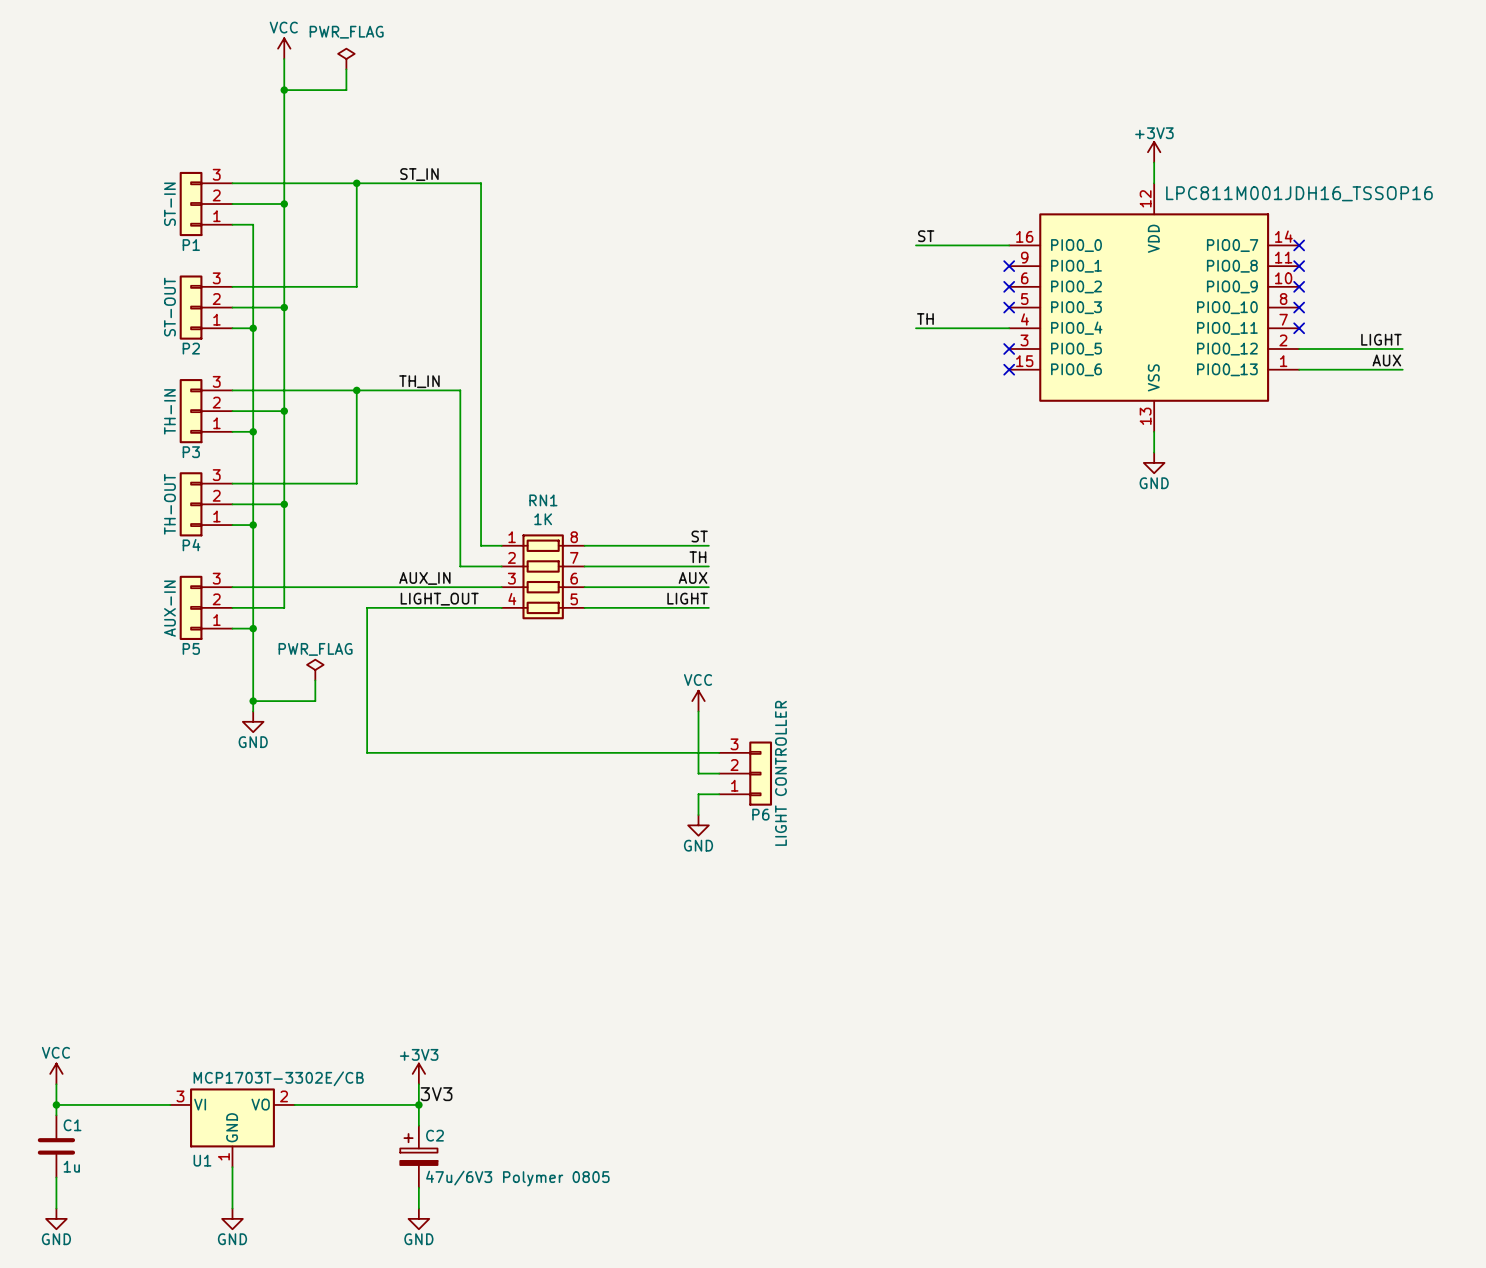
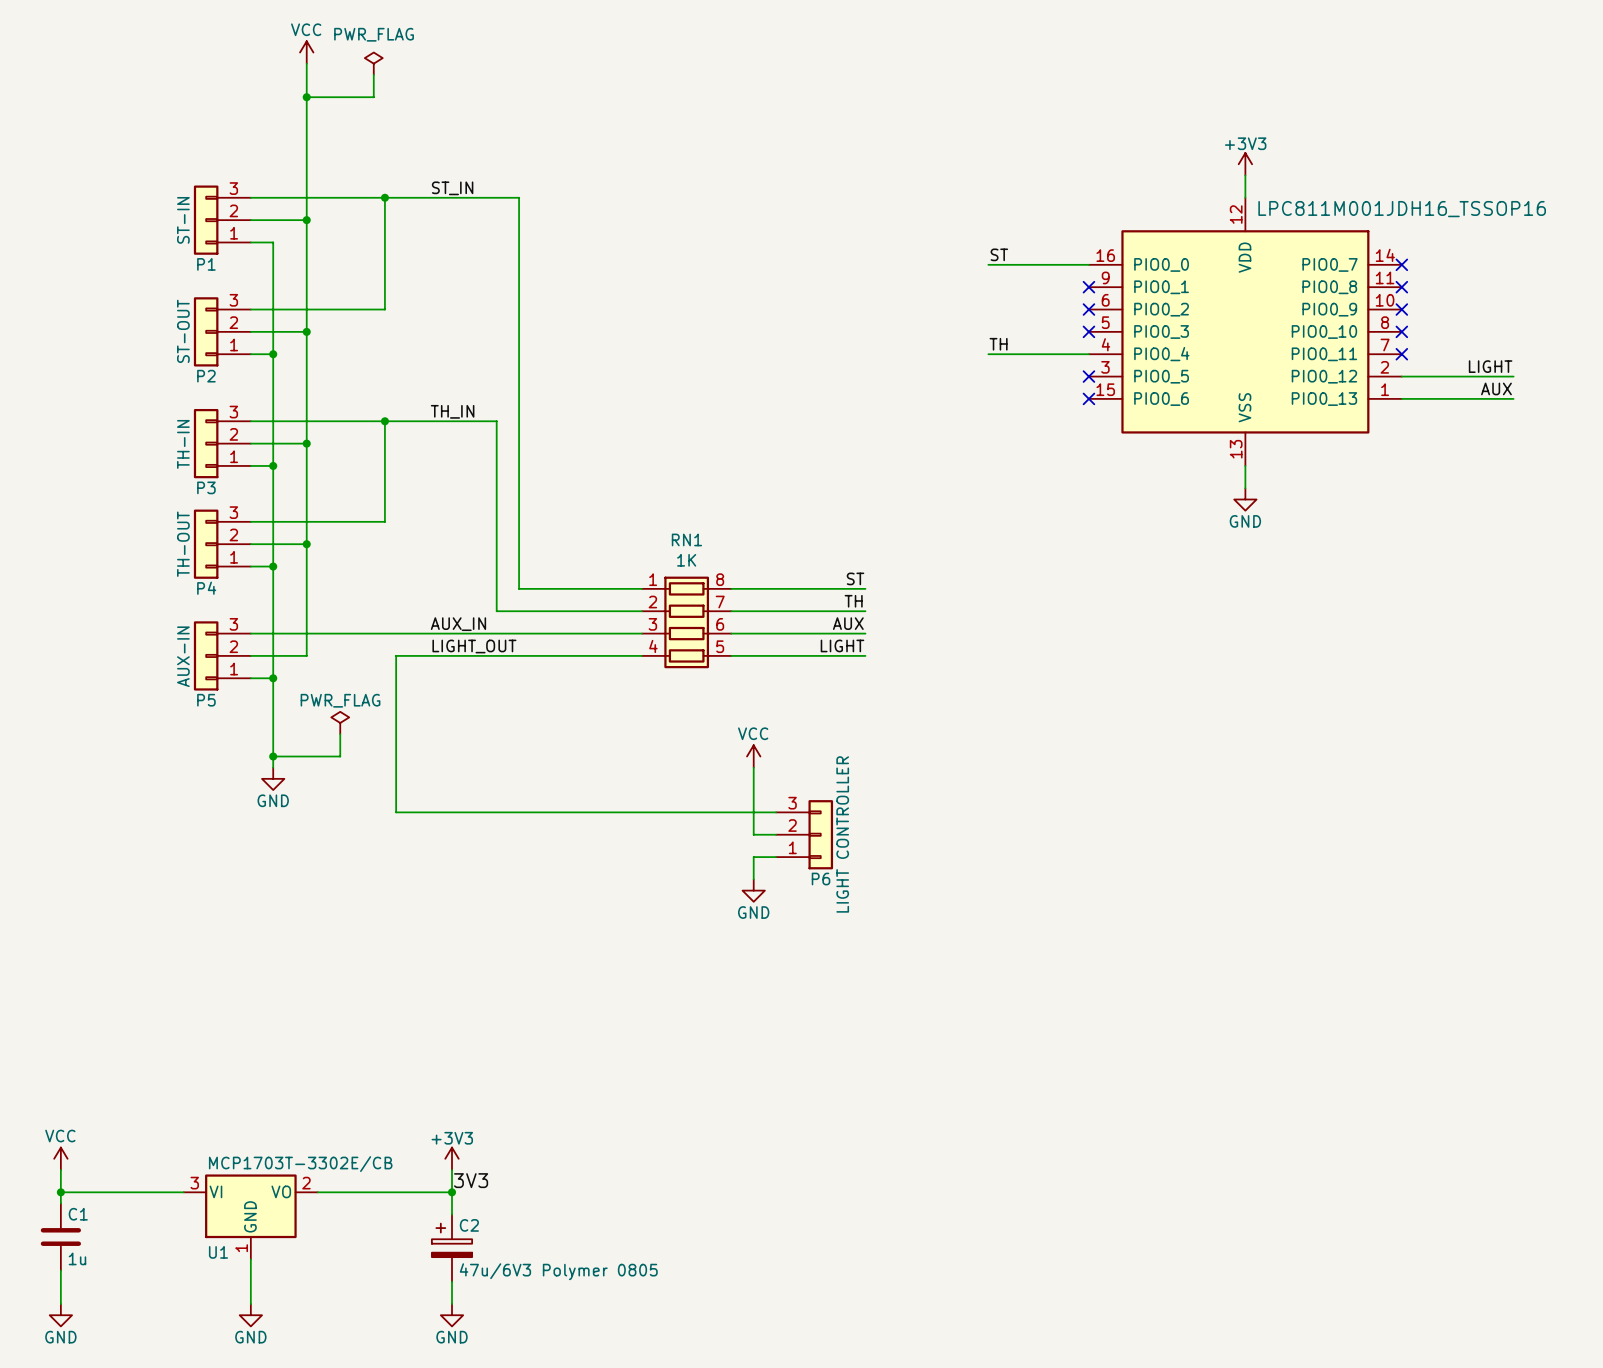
label position: ST (699, 536) -> ST (855, 578)
wire: none -> (764, 588) (865, 588)
label position: TH (697, 557) -> TH (853, 601)
wire: none -> (764, 611) (865, 611)
RN1 position: (543, 576) -> (686, 622)
label position: AUX (693, 577) -> AUX (848, 623)
wire: none -> (764, 633) (865, 633)
label position: LIGHT (687, 598) -> LIGHT (842, 645)
wire: none -> (764, 655) (865, 655)

